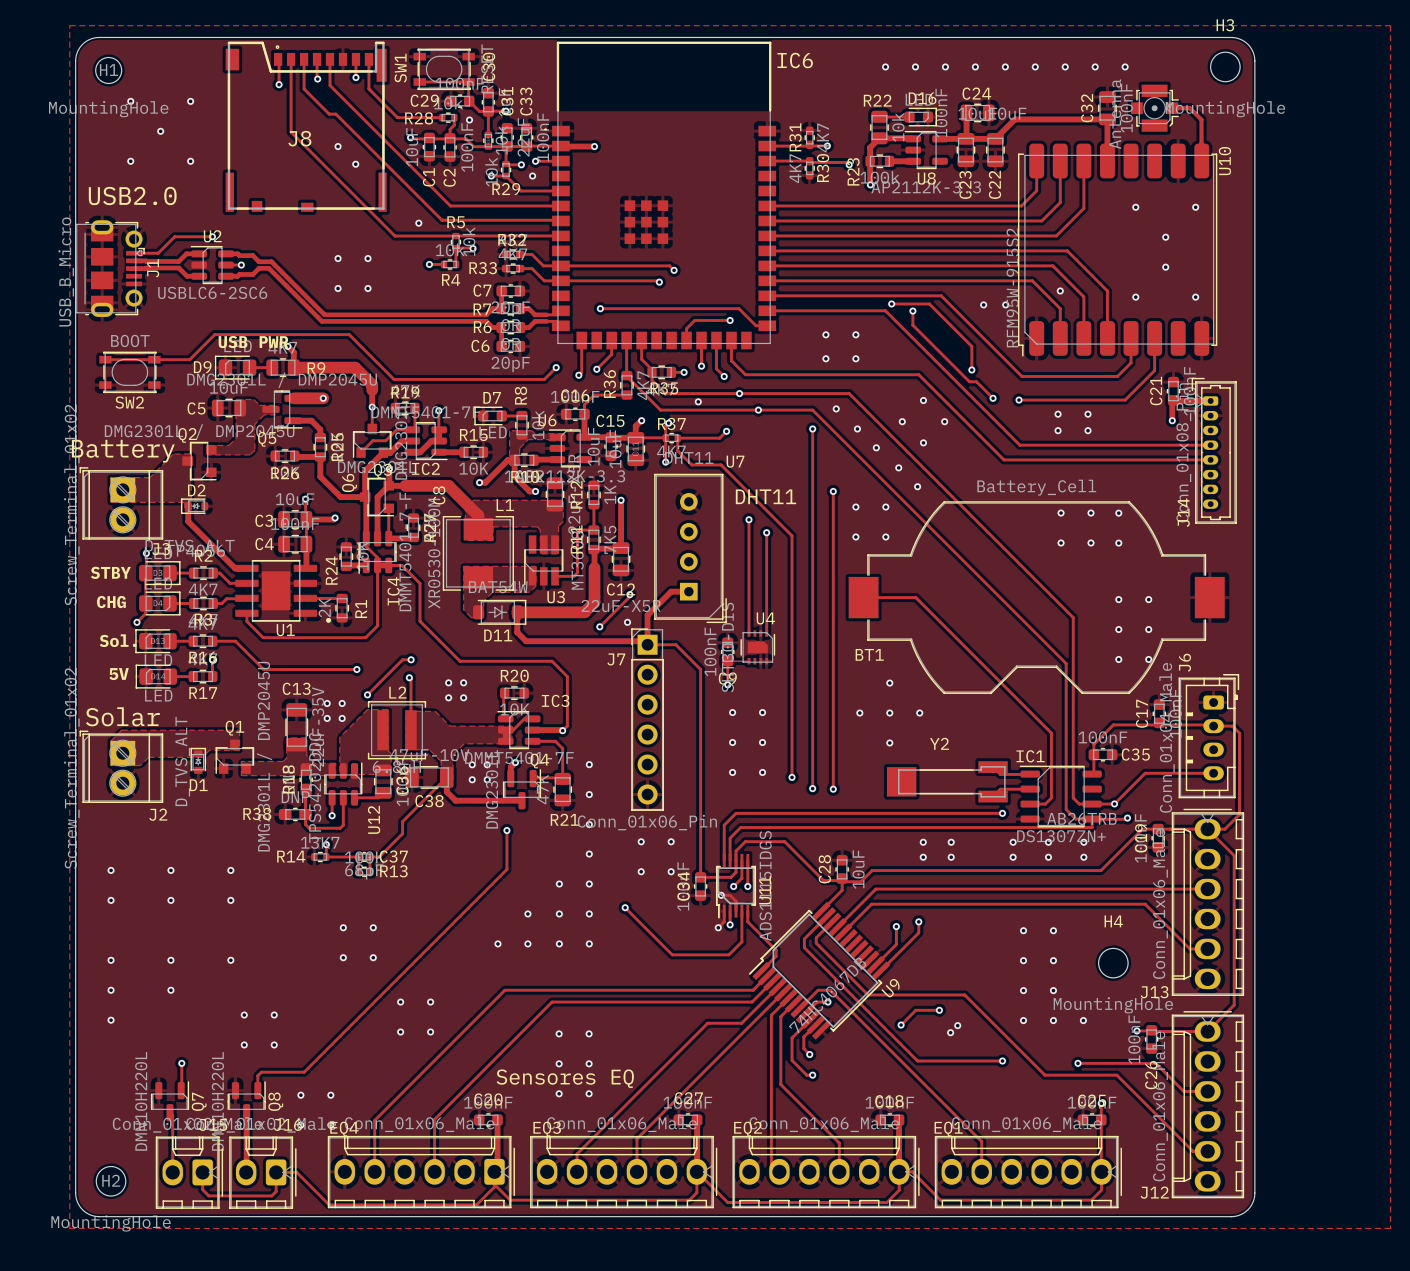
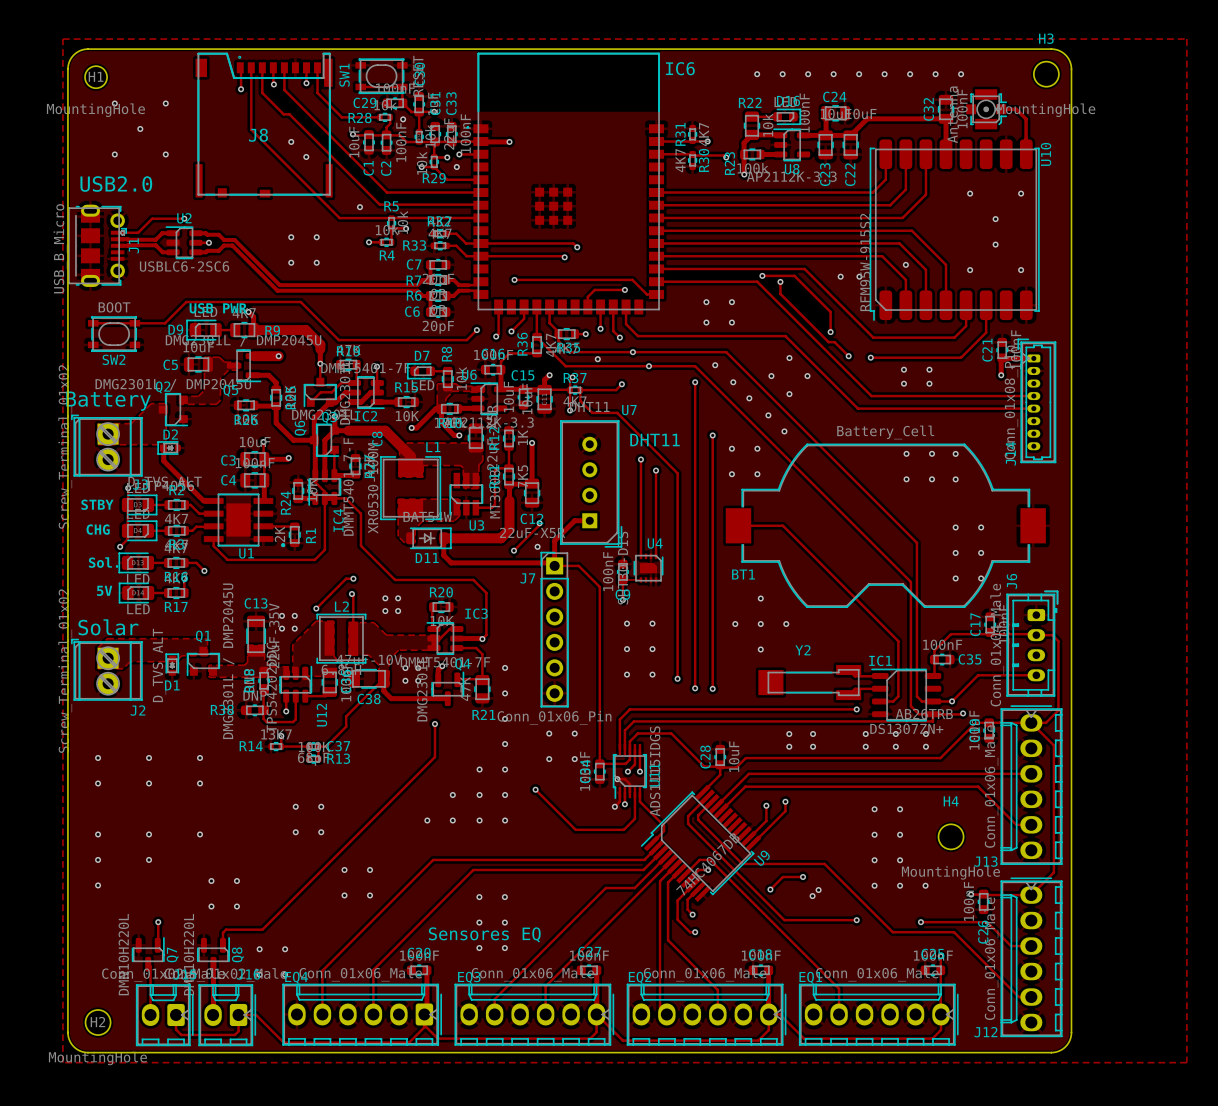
track: (226, 641) (235, 641) (263, 669) (356, 669) -> (196, 562) (204, 570)
via: none -> (204, 570)
via: (356, 669) -> none

